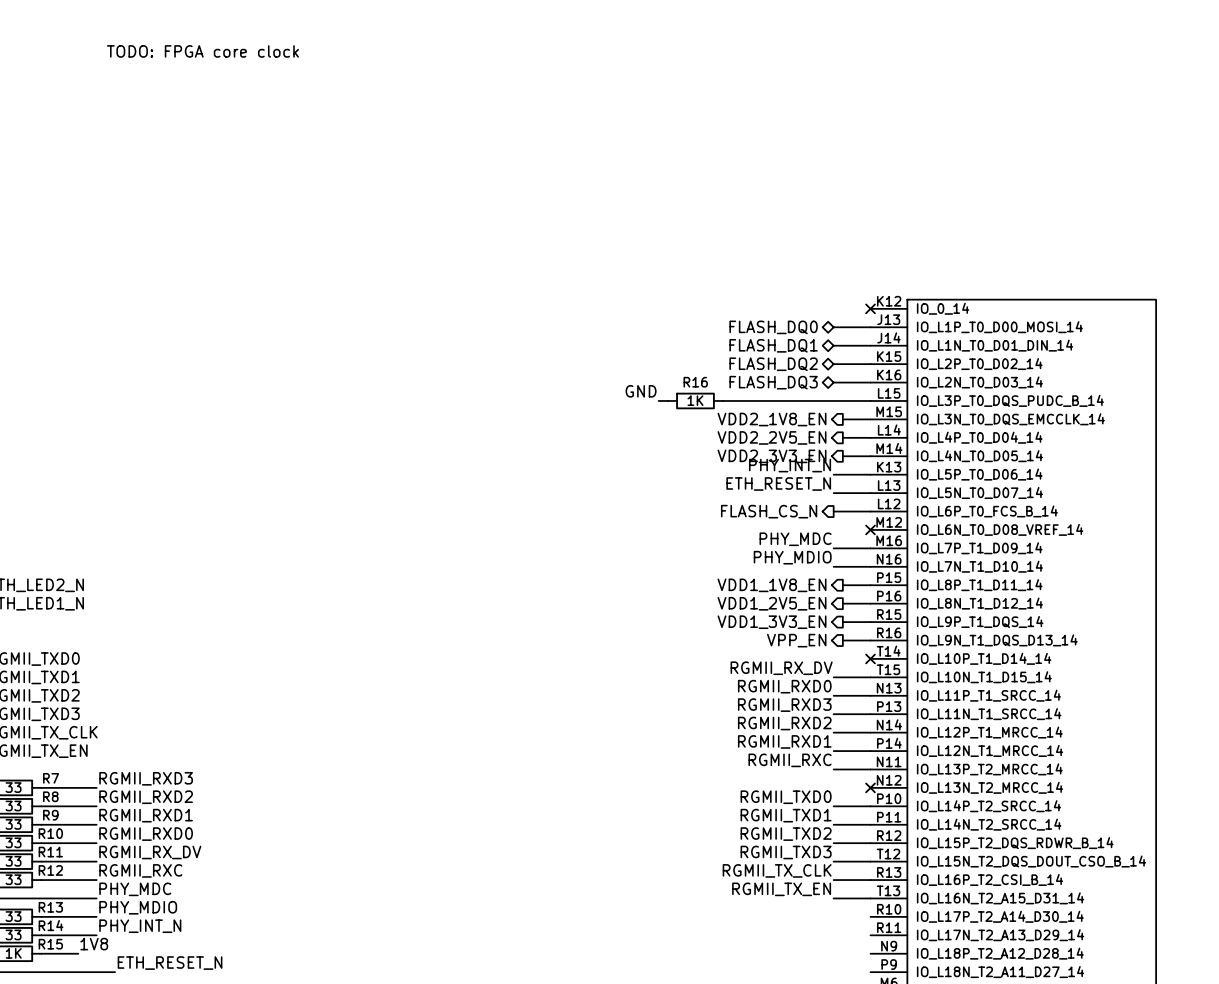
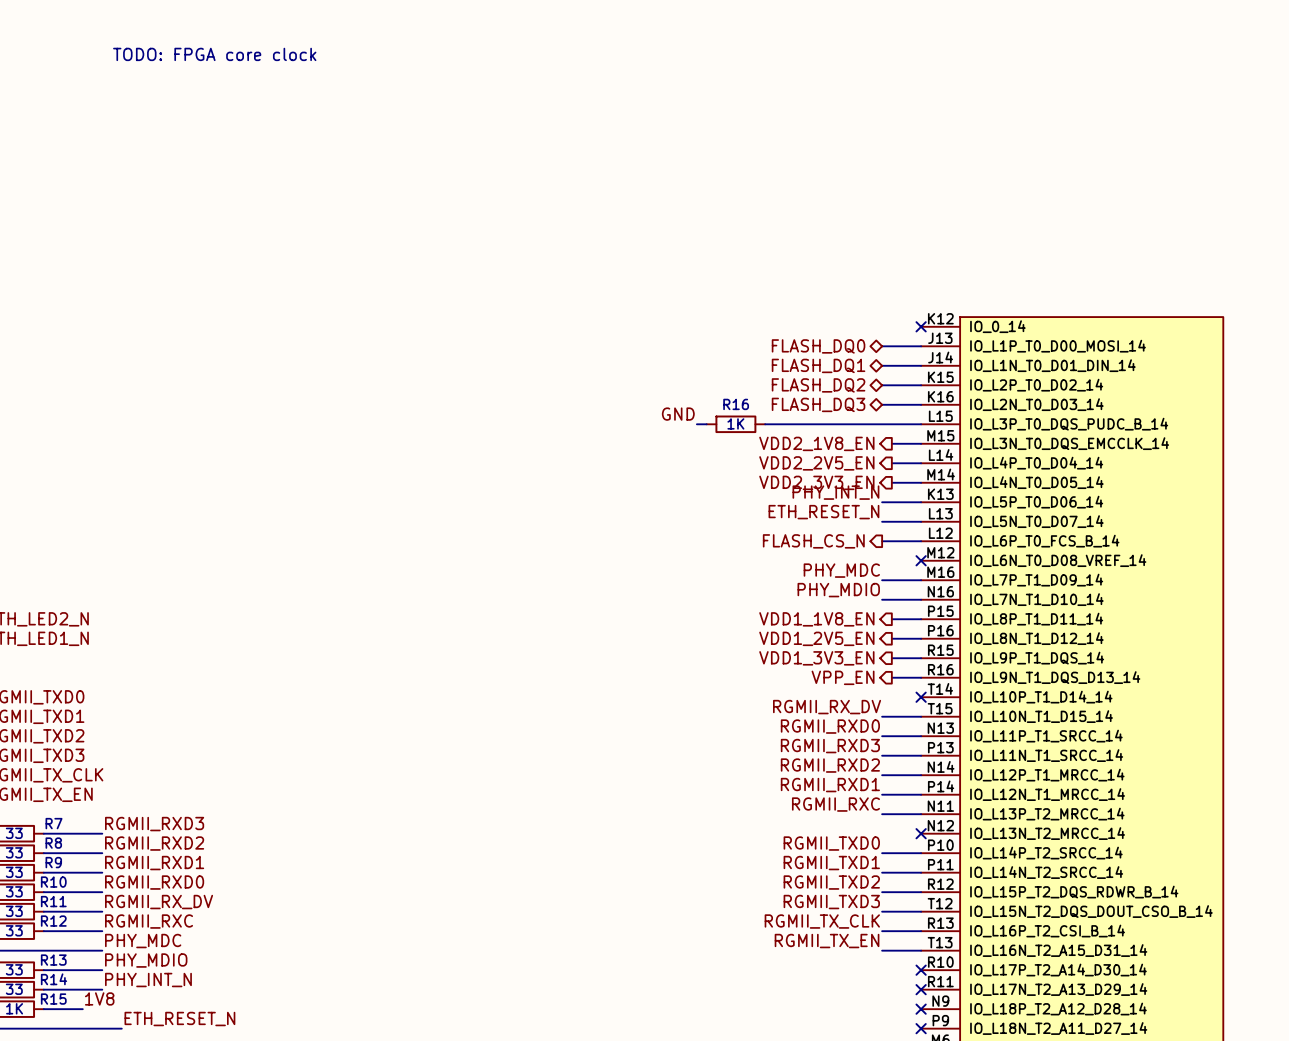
no-connect mark: none -> (921, 970)
no-connect mark: none -> (921, 989)
no-connect mark: none -> (921, 1009)
no-connect mark: none -> (921, 1028)

